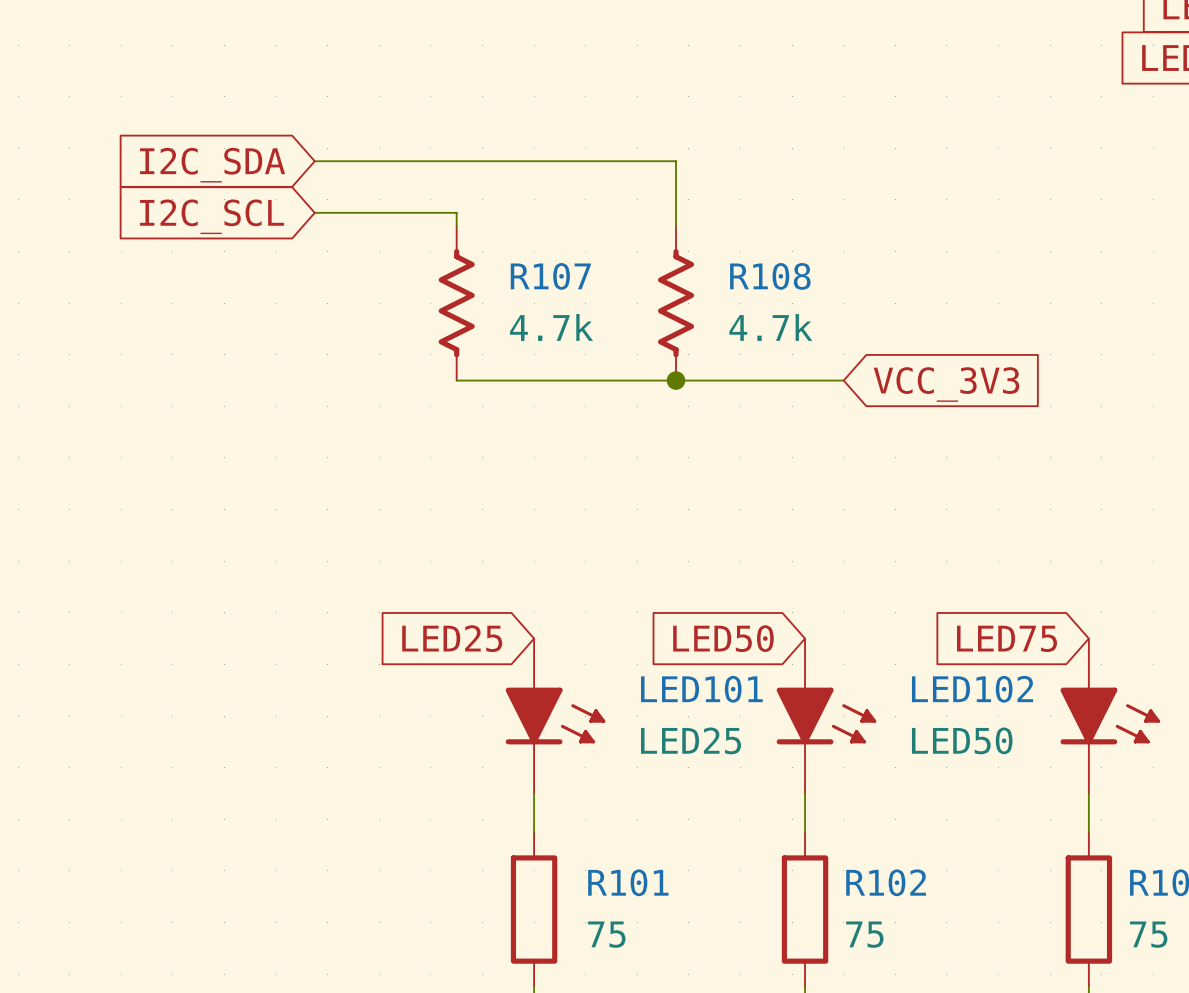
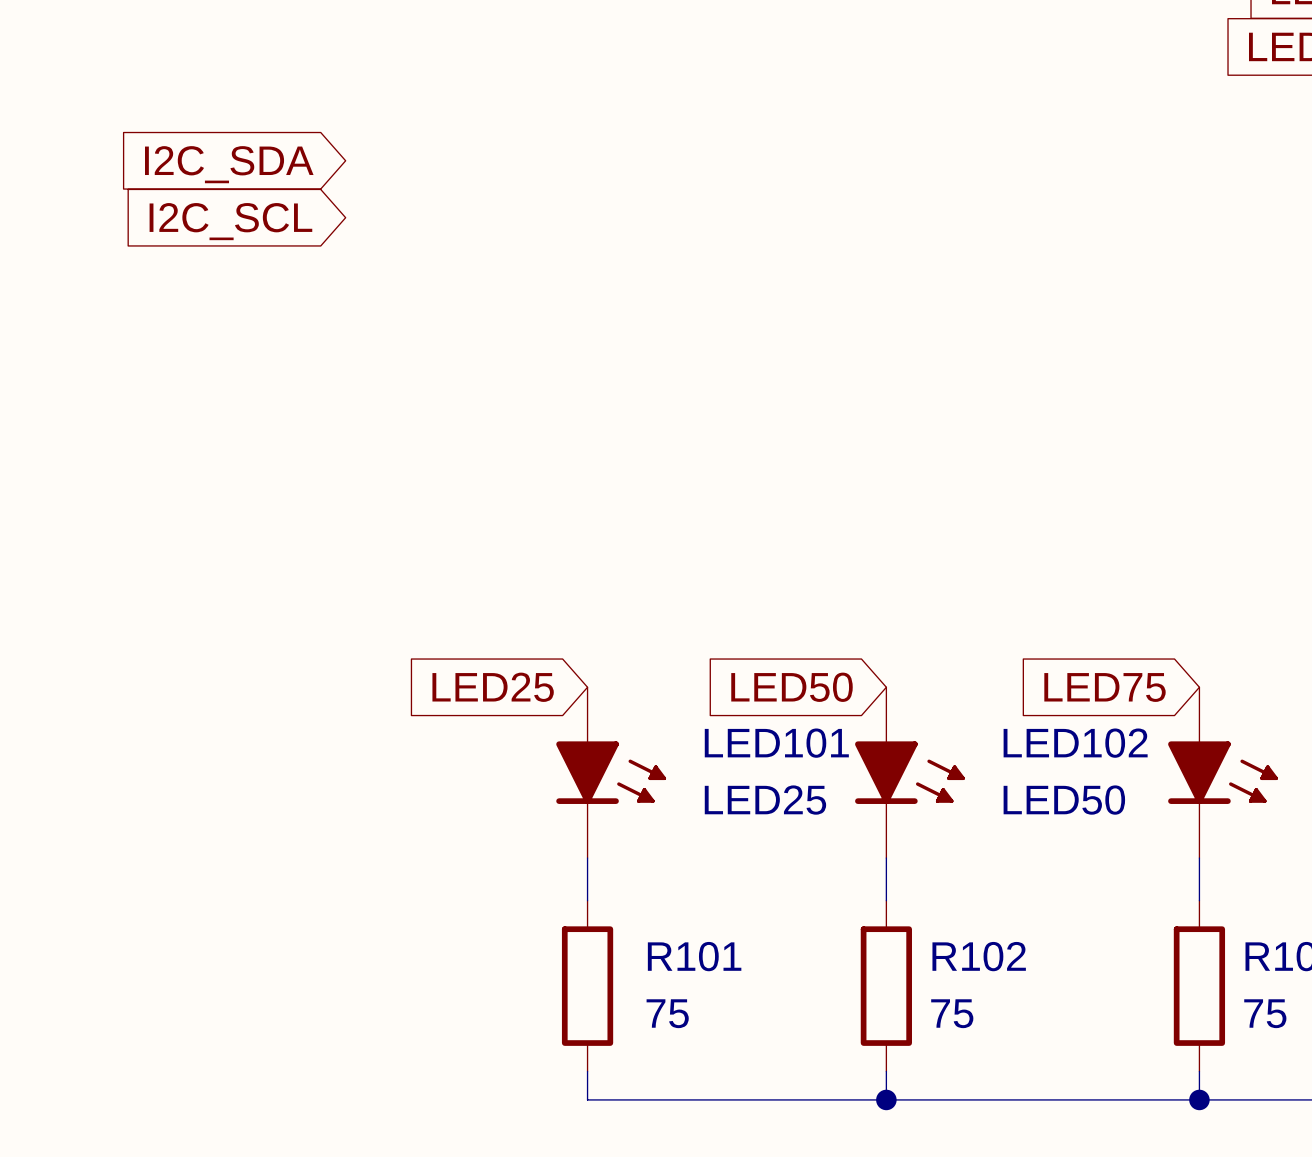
wire: (314, 161) (676, 161) (676, 225) -> none
wire: (314, 212) (456, 212) (456, 225) -> none
R107: 4.7k (456, 303) -> none
R108: 4.7k (676, 303) -> none
wire: (456, 380) (843, 380) -> none
junction: (676, 380) -> none
global label: VCC_3V3 (946, 384) -> none

